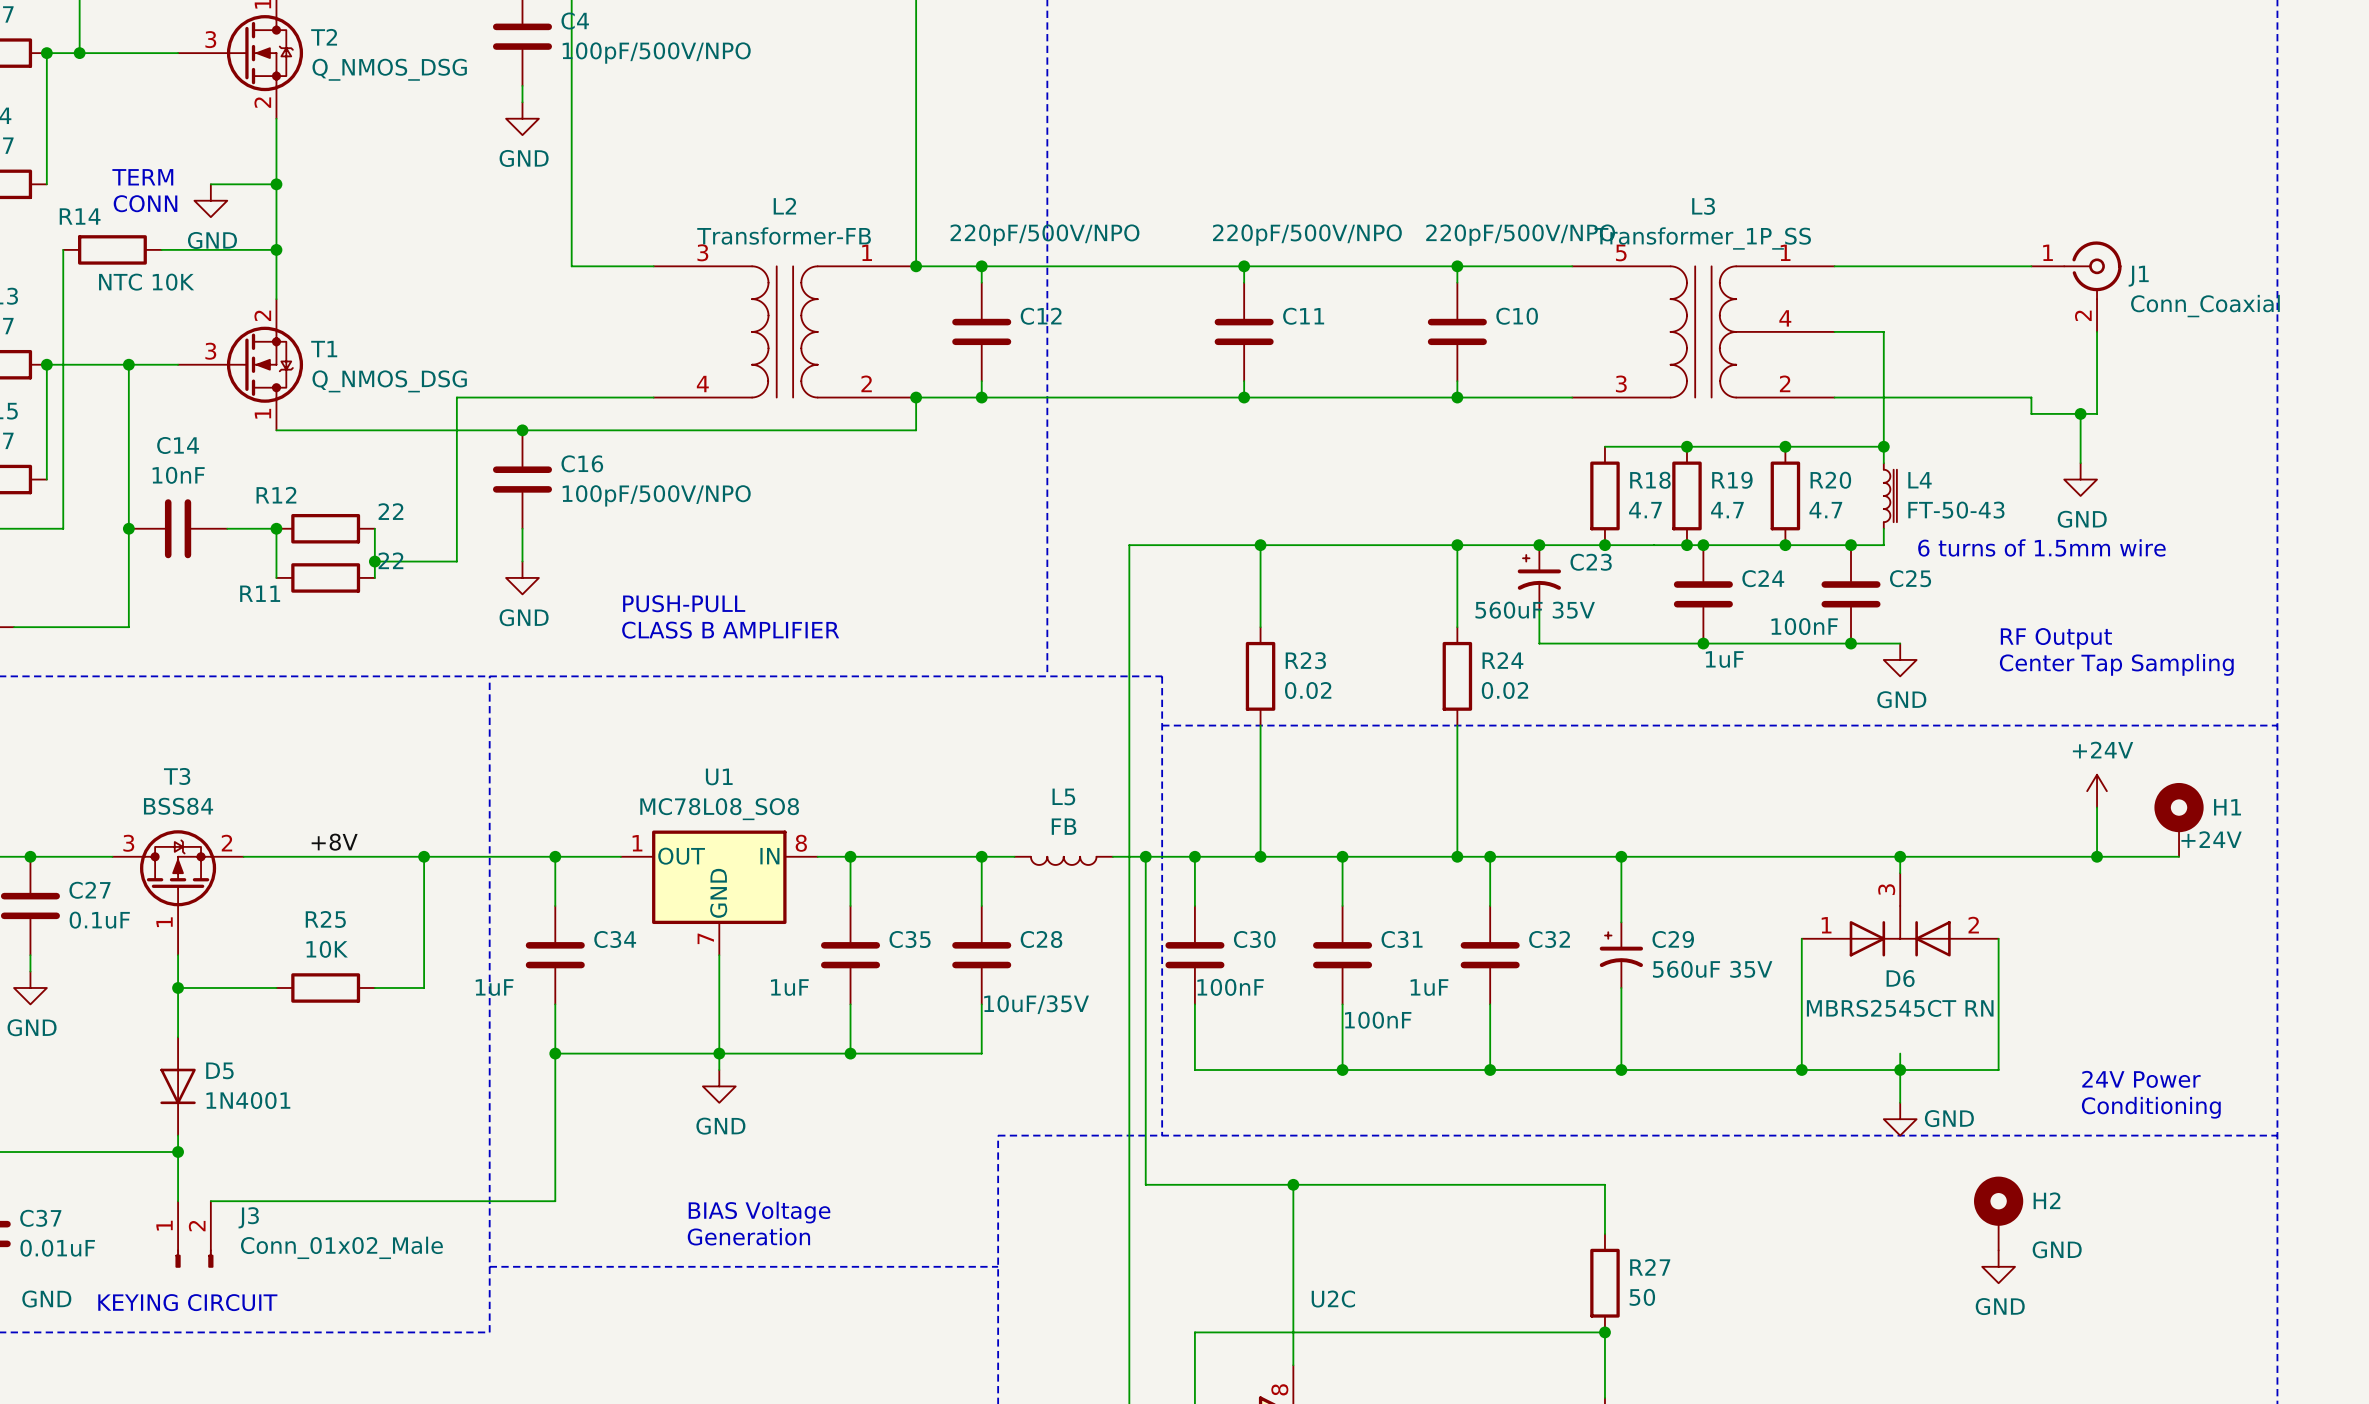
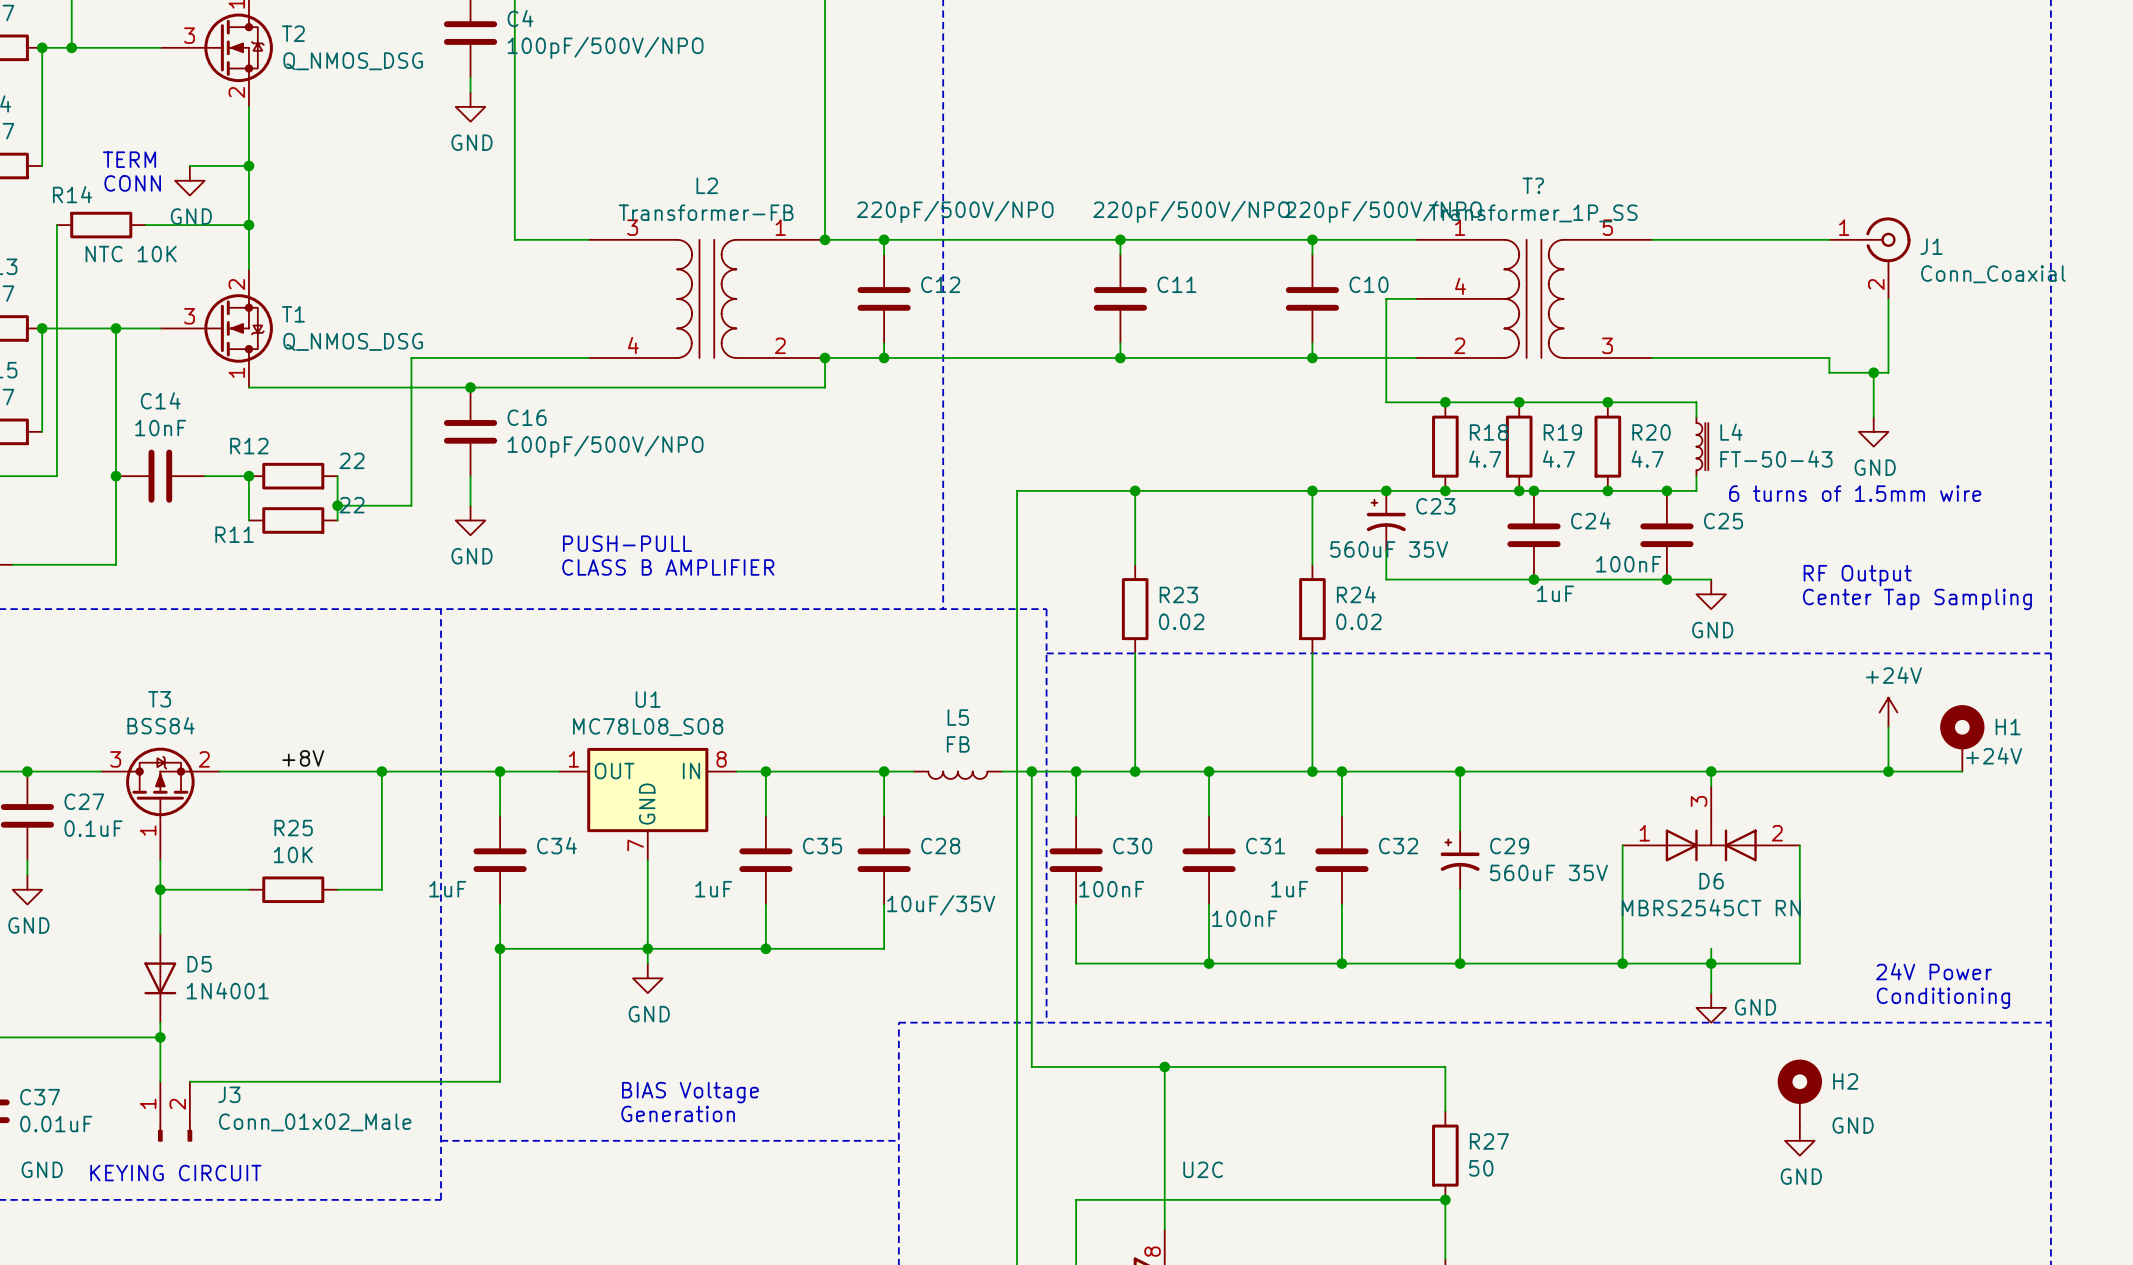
wire: none -> (1415, 298) (1386, 298) (1386, 402) (1445, 402)
L3: Transformer_1P_SS (1703, 331) -> none
T?: none -> Transformer_1P_SS (1533, 298)
wire: (1834, 331) (1883, 331) (1883, 446) -> none
junction: none -> (1445, 402)
junction: (1883, 446) -> none

